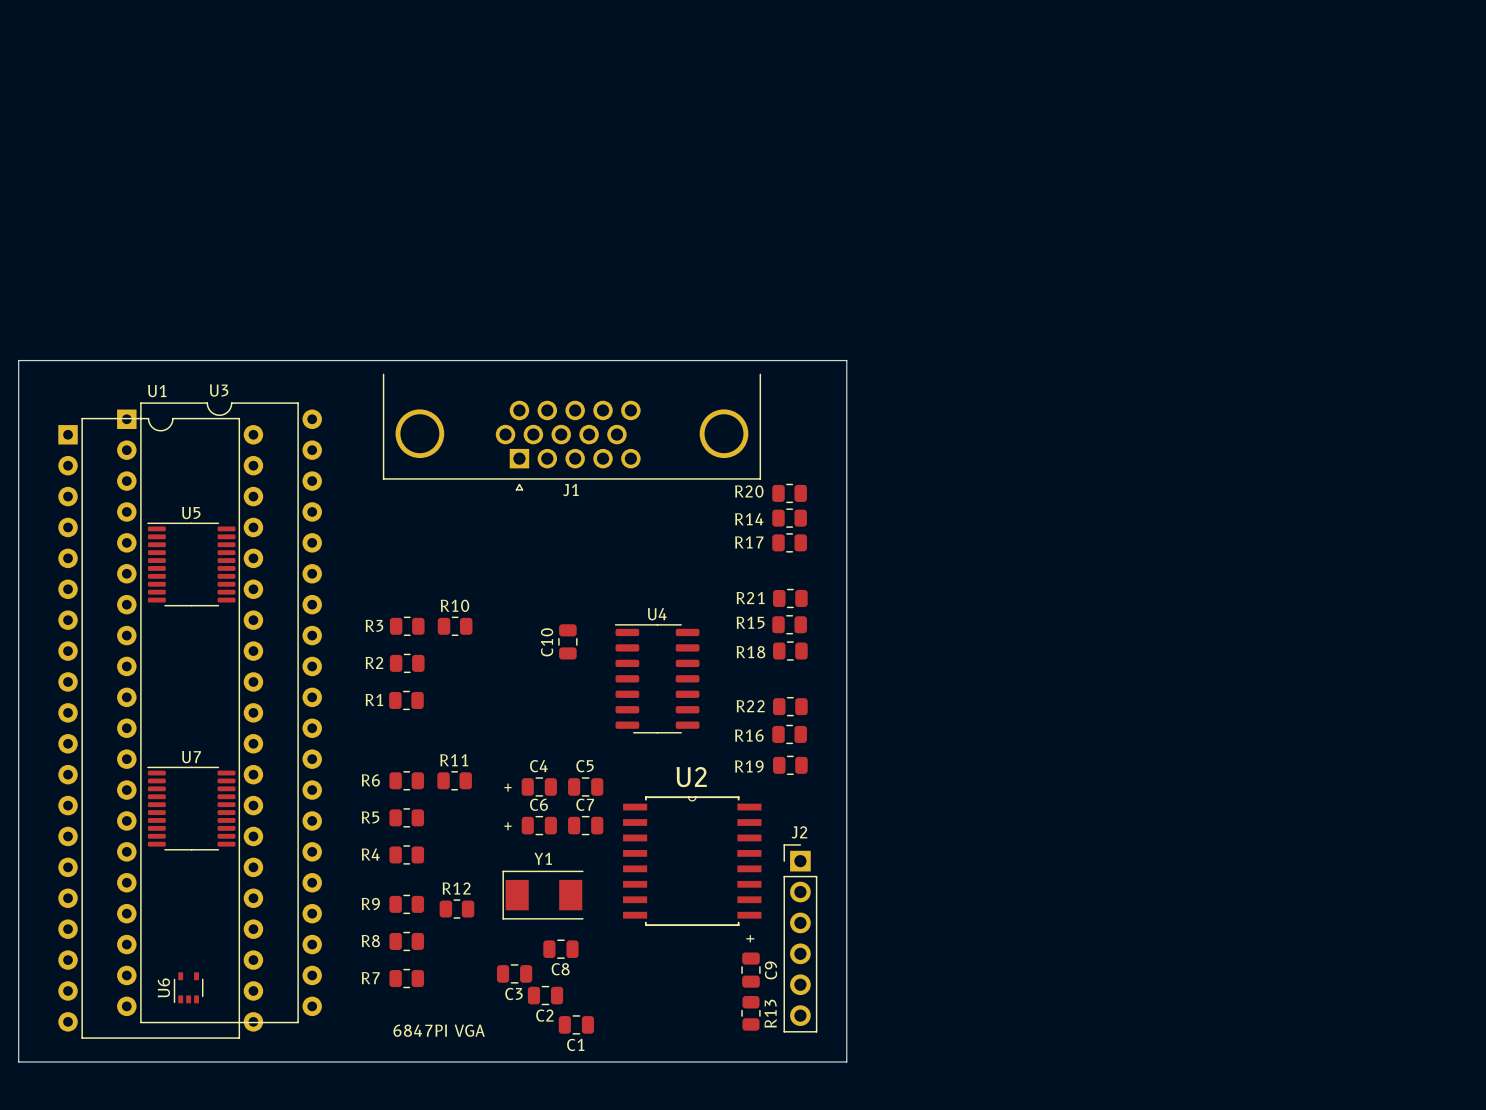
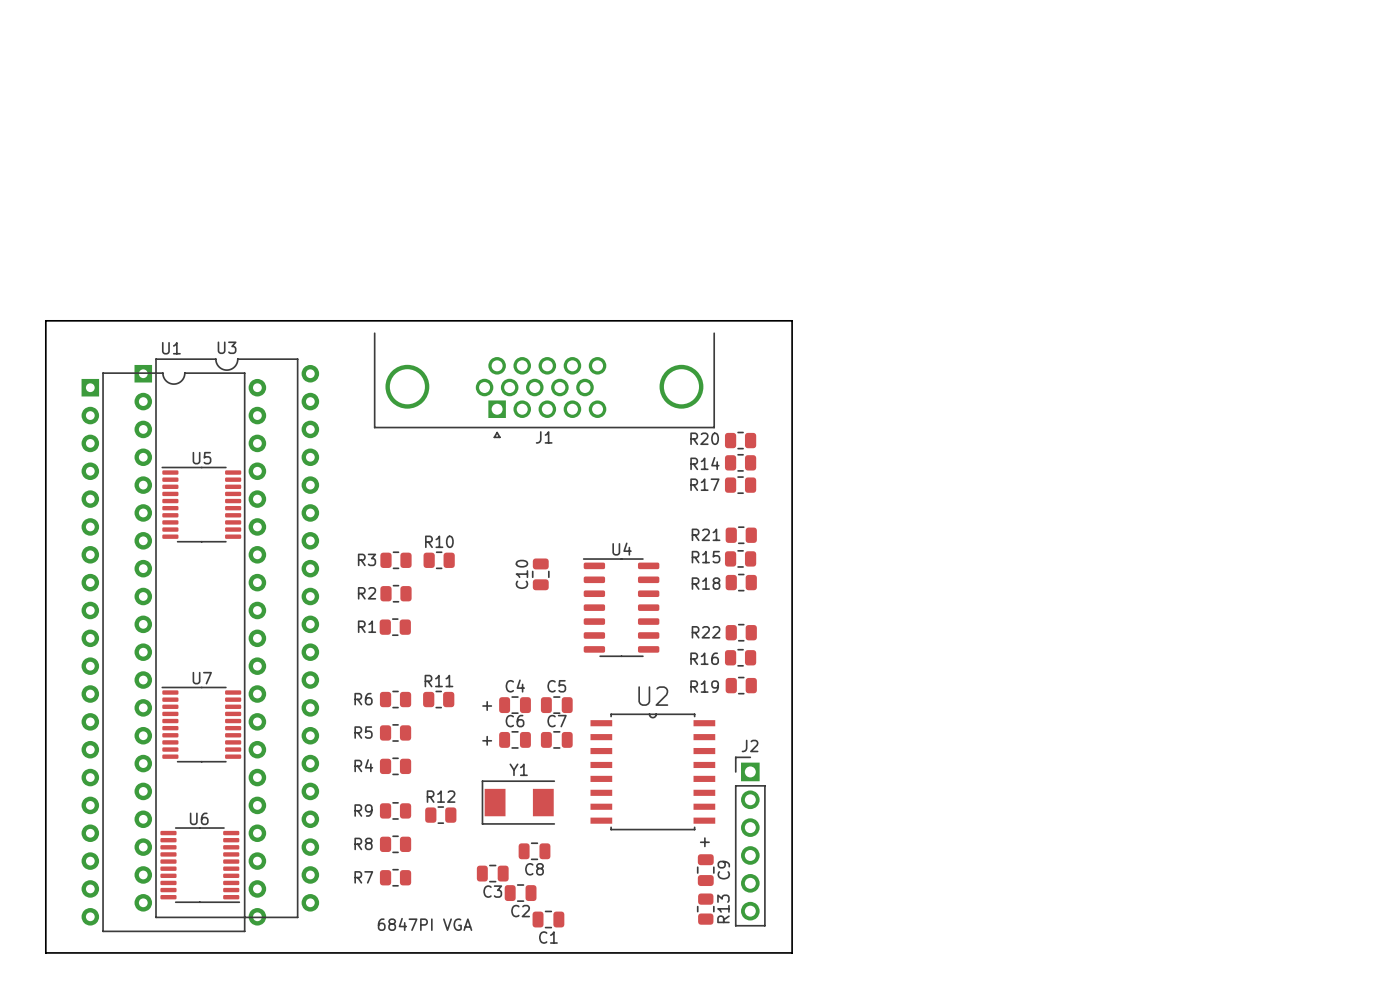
U6 footprint: [173, 972, 204, 1004] -> [160, 827, 240, 903]
U6 name position: U6 (163, 987) -> U6 (199, 818)

